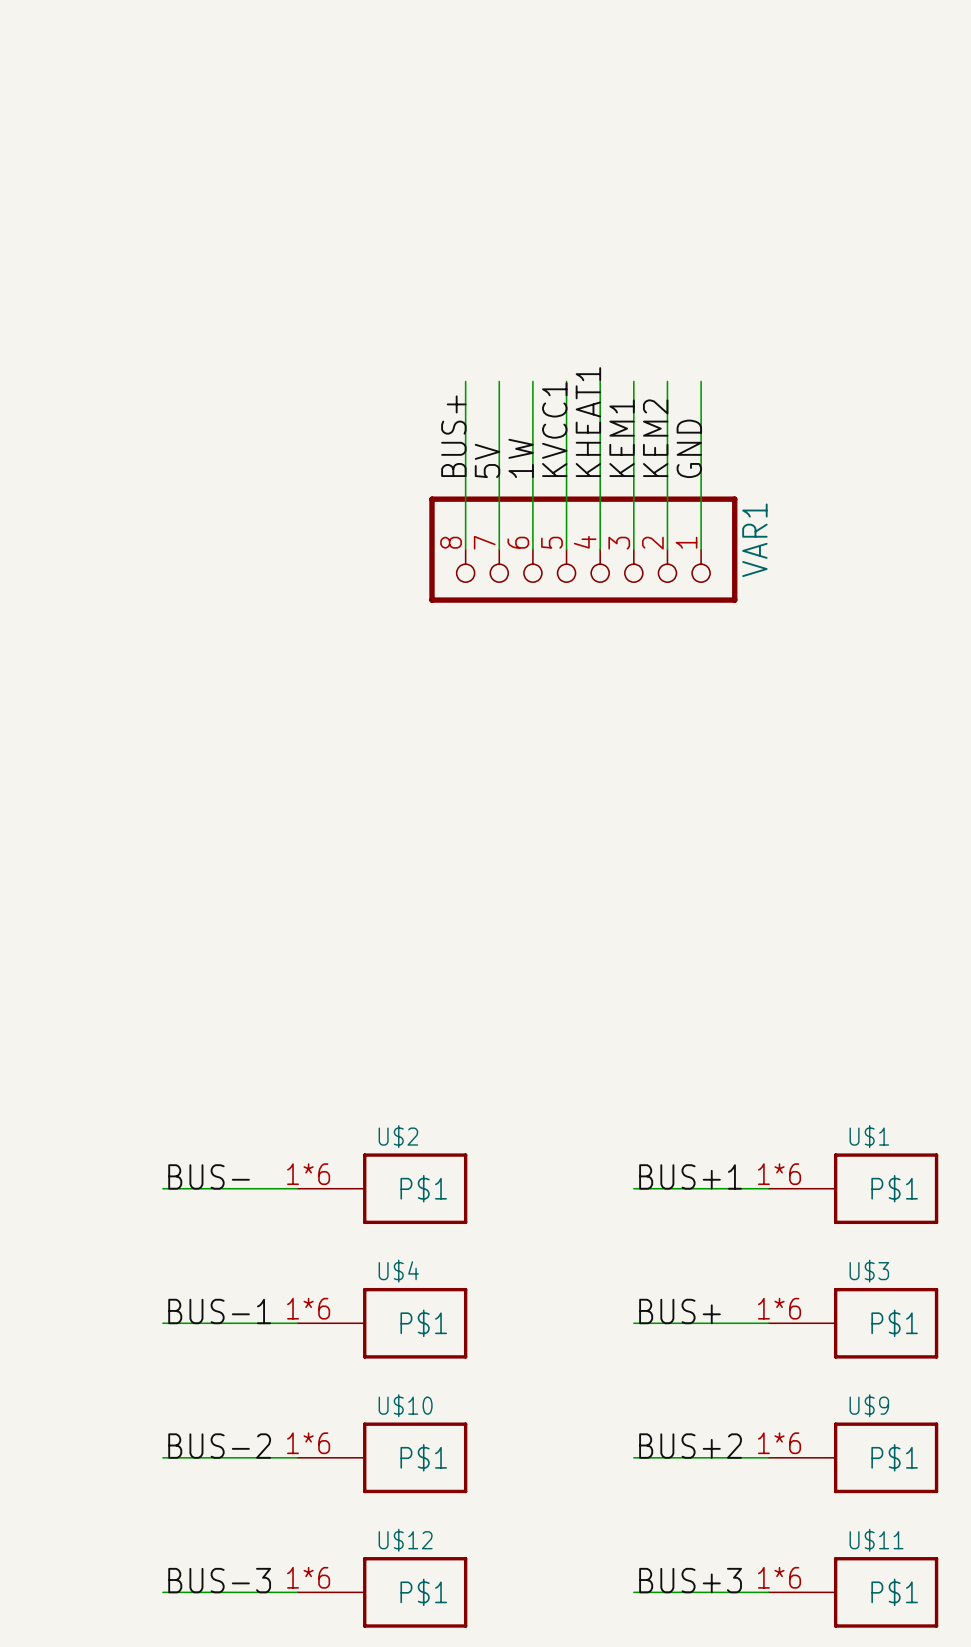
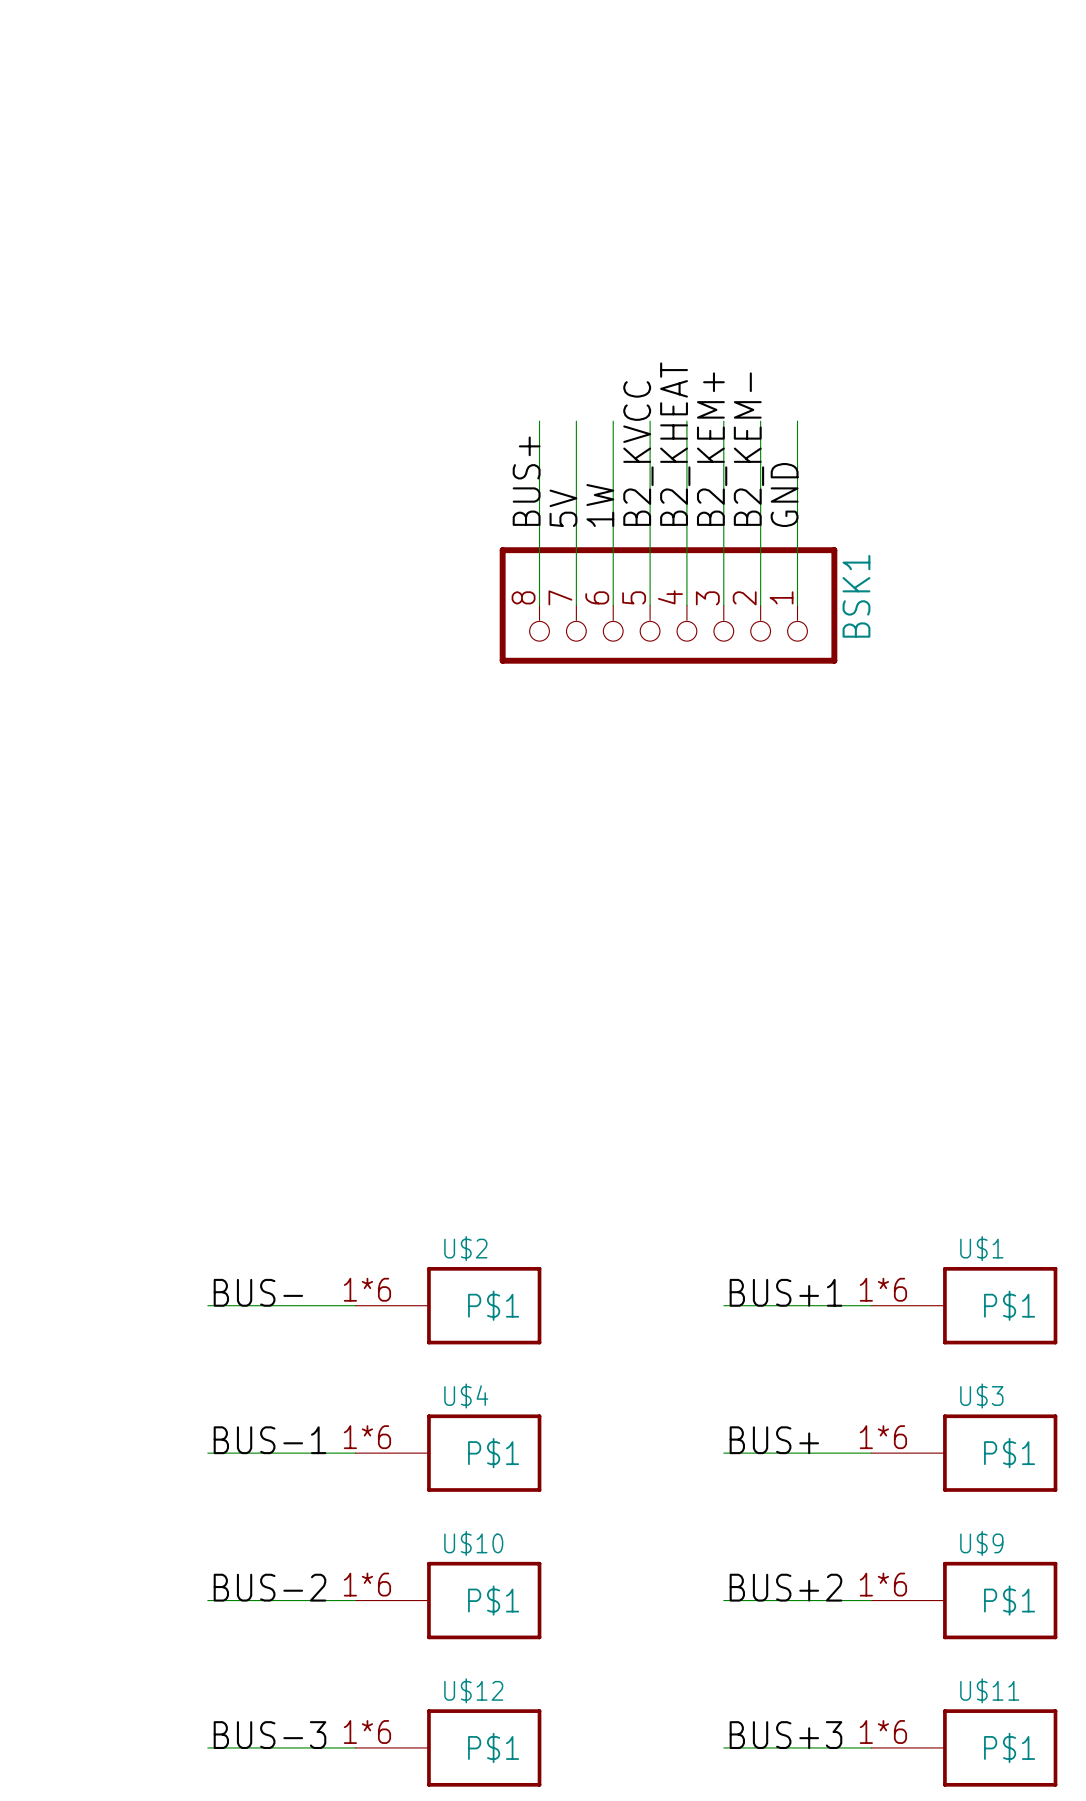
label: KHEAT1 (588, 422) -> B2_KHEAT (675, 444)
label: KVCC1 (554, 429) -> B2_KVCC (638, 453)
label: KEM1 (622, 438) -> B2_KEM+ (712, 449)
label: KEM2 (655, 438) -> B2_KEM- (748, 449)
VAR1 name: VAR1 (754, 540) -> BSK1 (856, 596)

